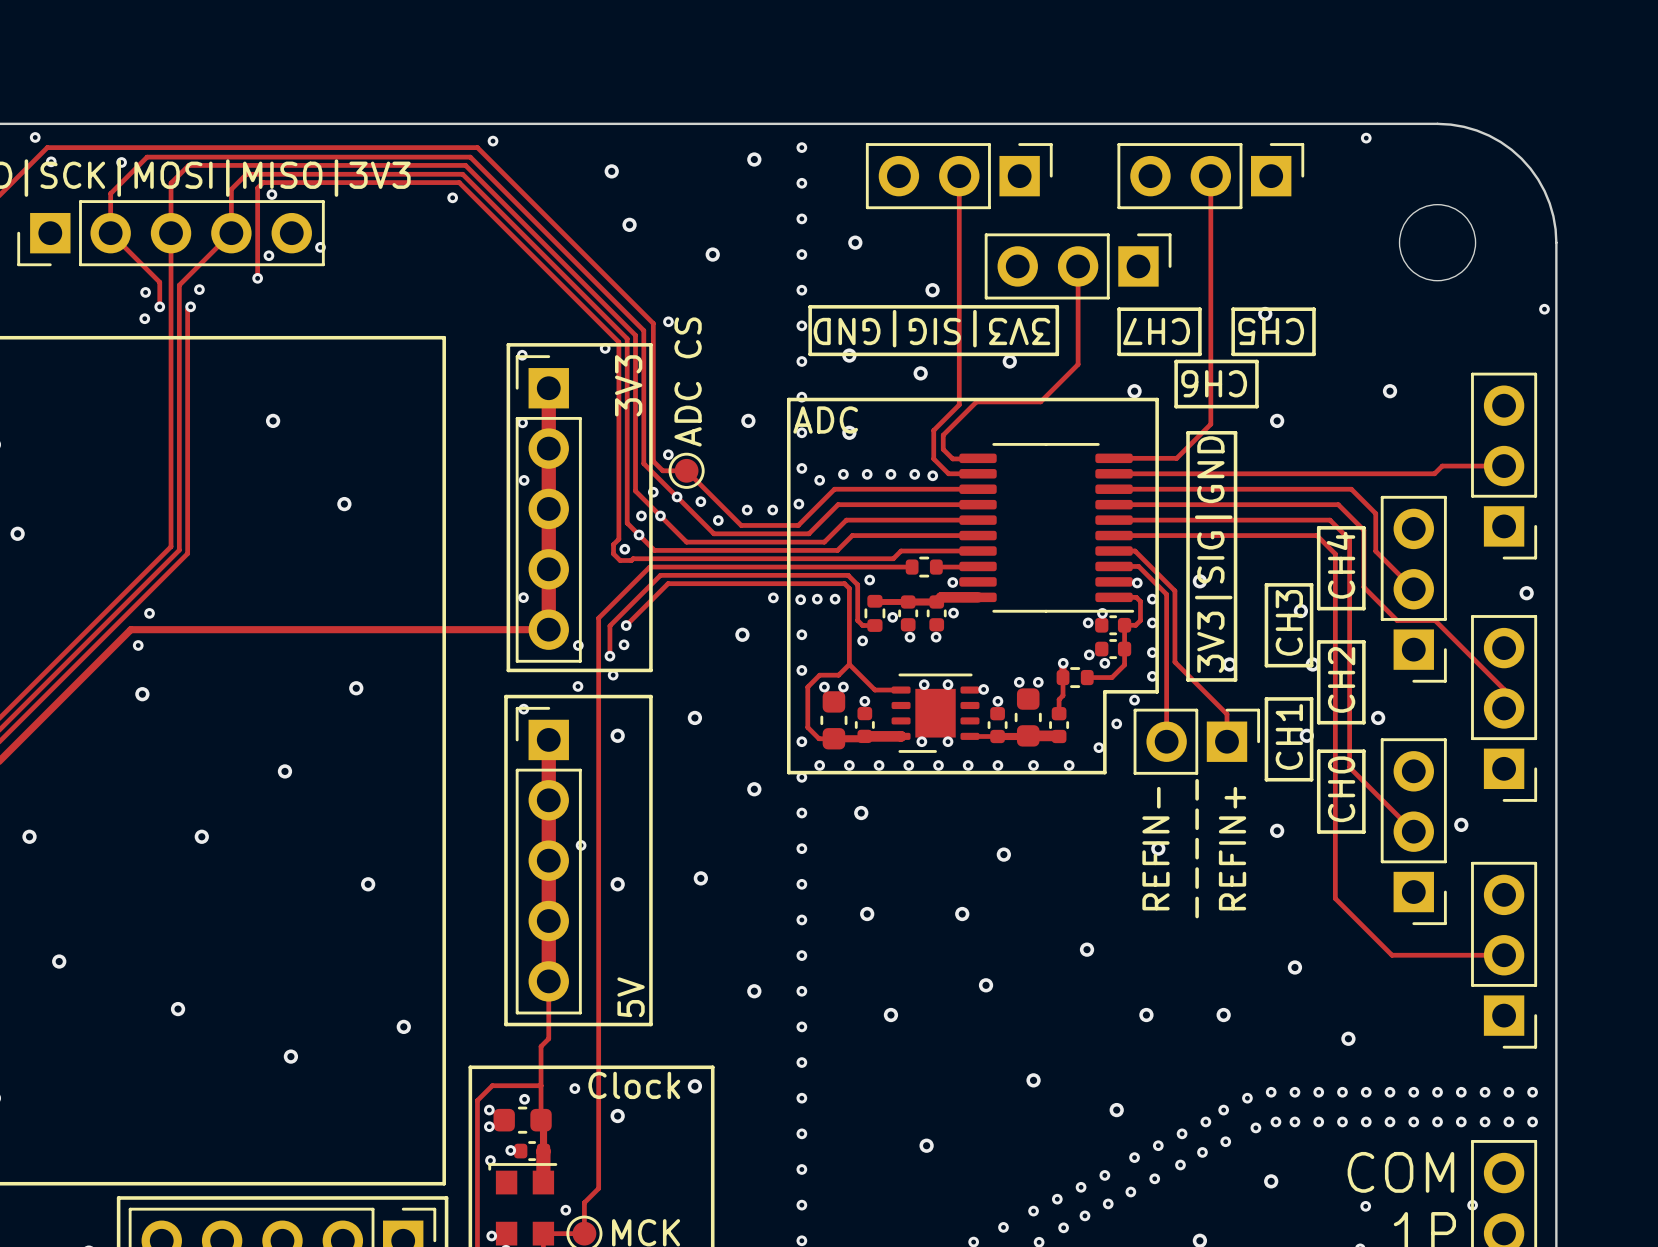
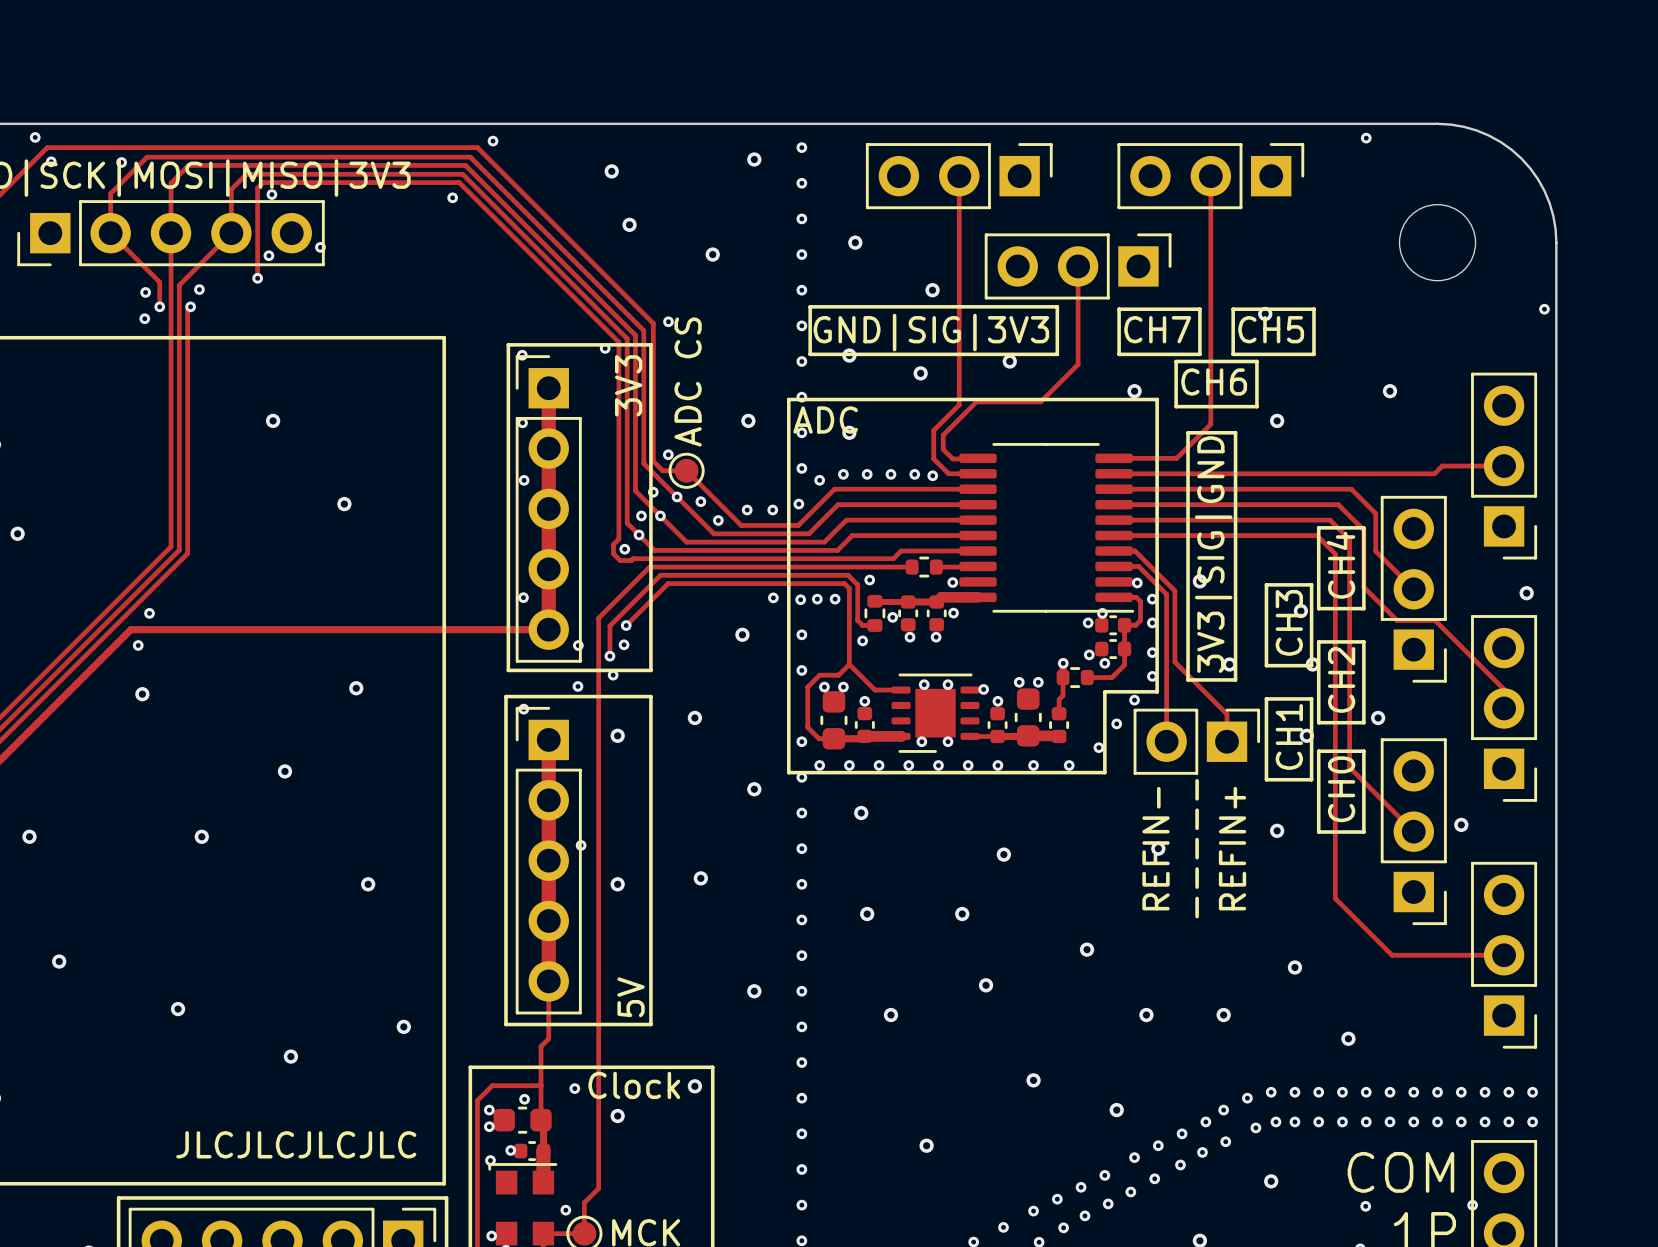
text: 3V3|SIG|GND (931, 328) -> GND|SIG|3V3 (931, 332)
text rotation: 0° (1156, 331) -> 180° (1157, 329)
text rotation: 0° (1271, 331) -> 180° (1271, 329)
text rotation: 0° (1214, 383) -> 180° (1214, 381)
text: none -> JLCJLCJLCJLC (296, 1144)

